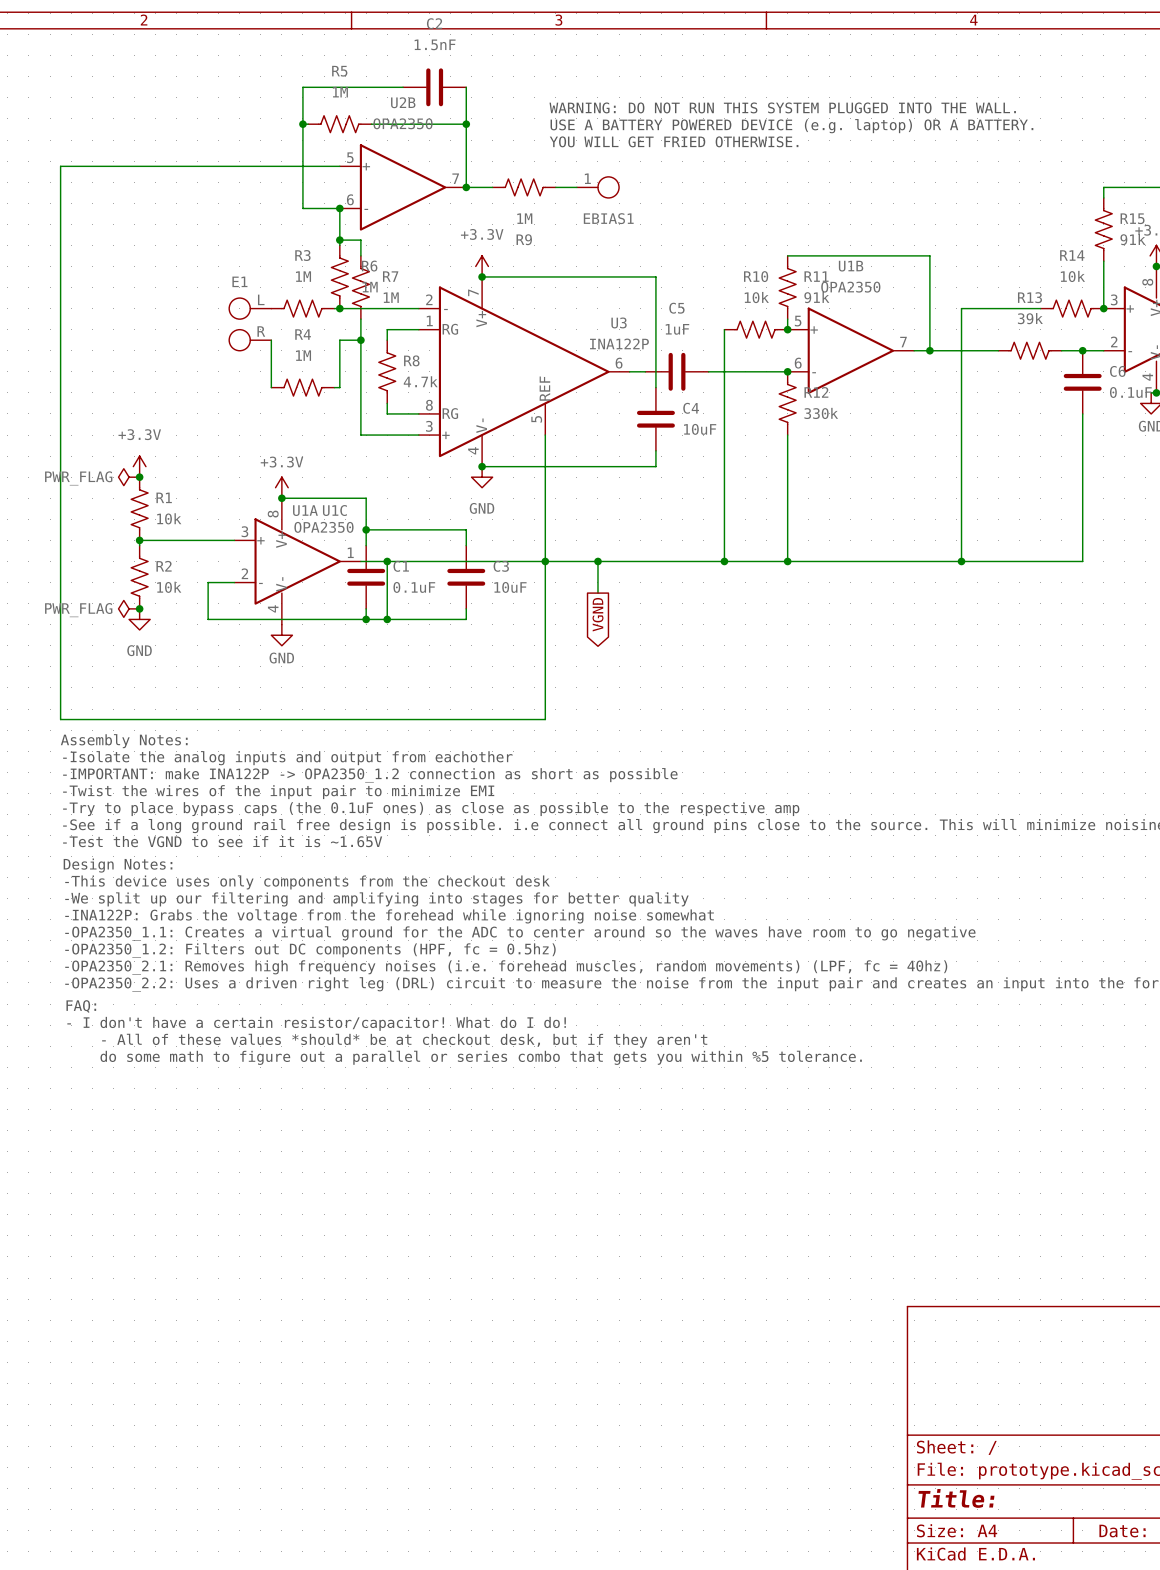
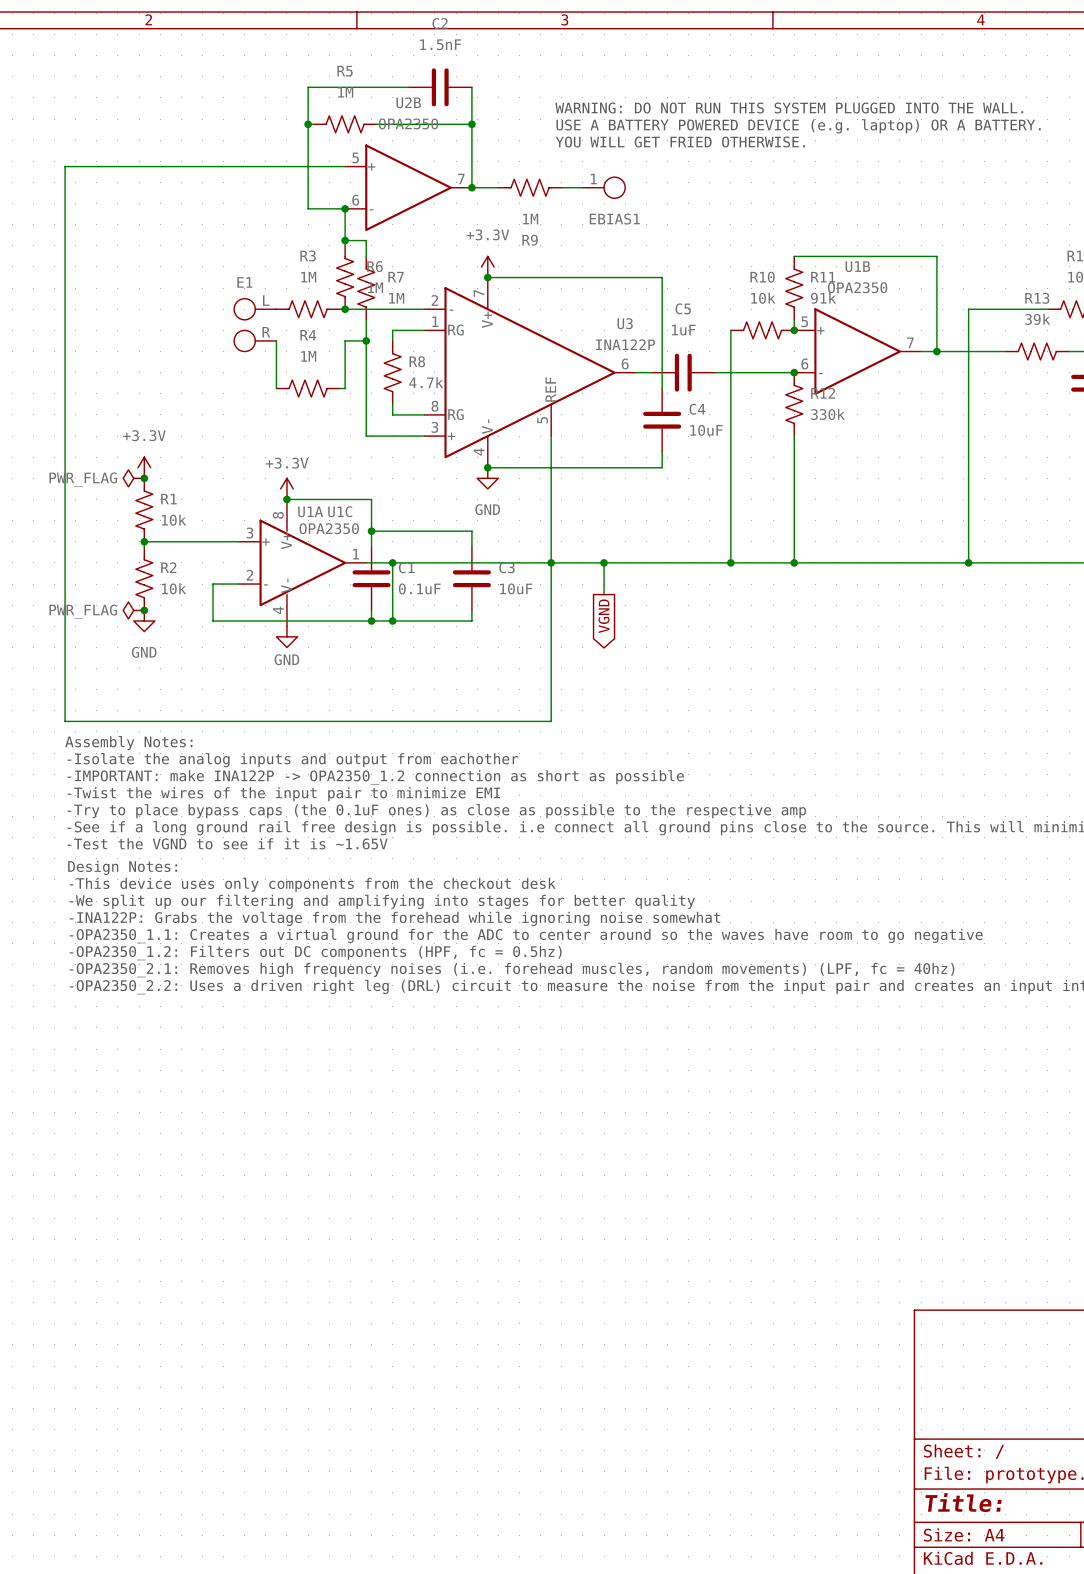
text: FAQ: (81, 1006) -> none
text: - I don't have a certain resistor/capacitor! What do I do! (316, 1023) -> none
text: - All of these values *should* be at checkout desk, but if they aren't (404, 1040) -> none
text: do some math to figure out a parallel or series combo that gets you within %5 tolerance. (481, 1057) -> none

